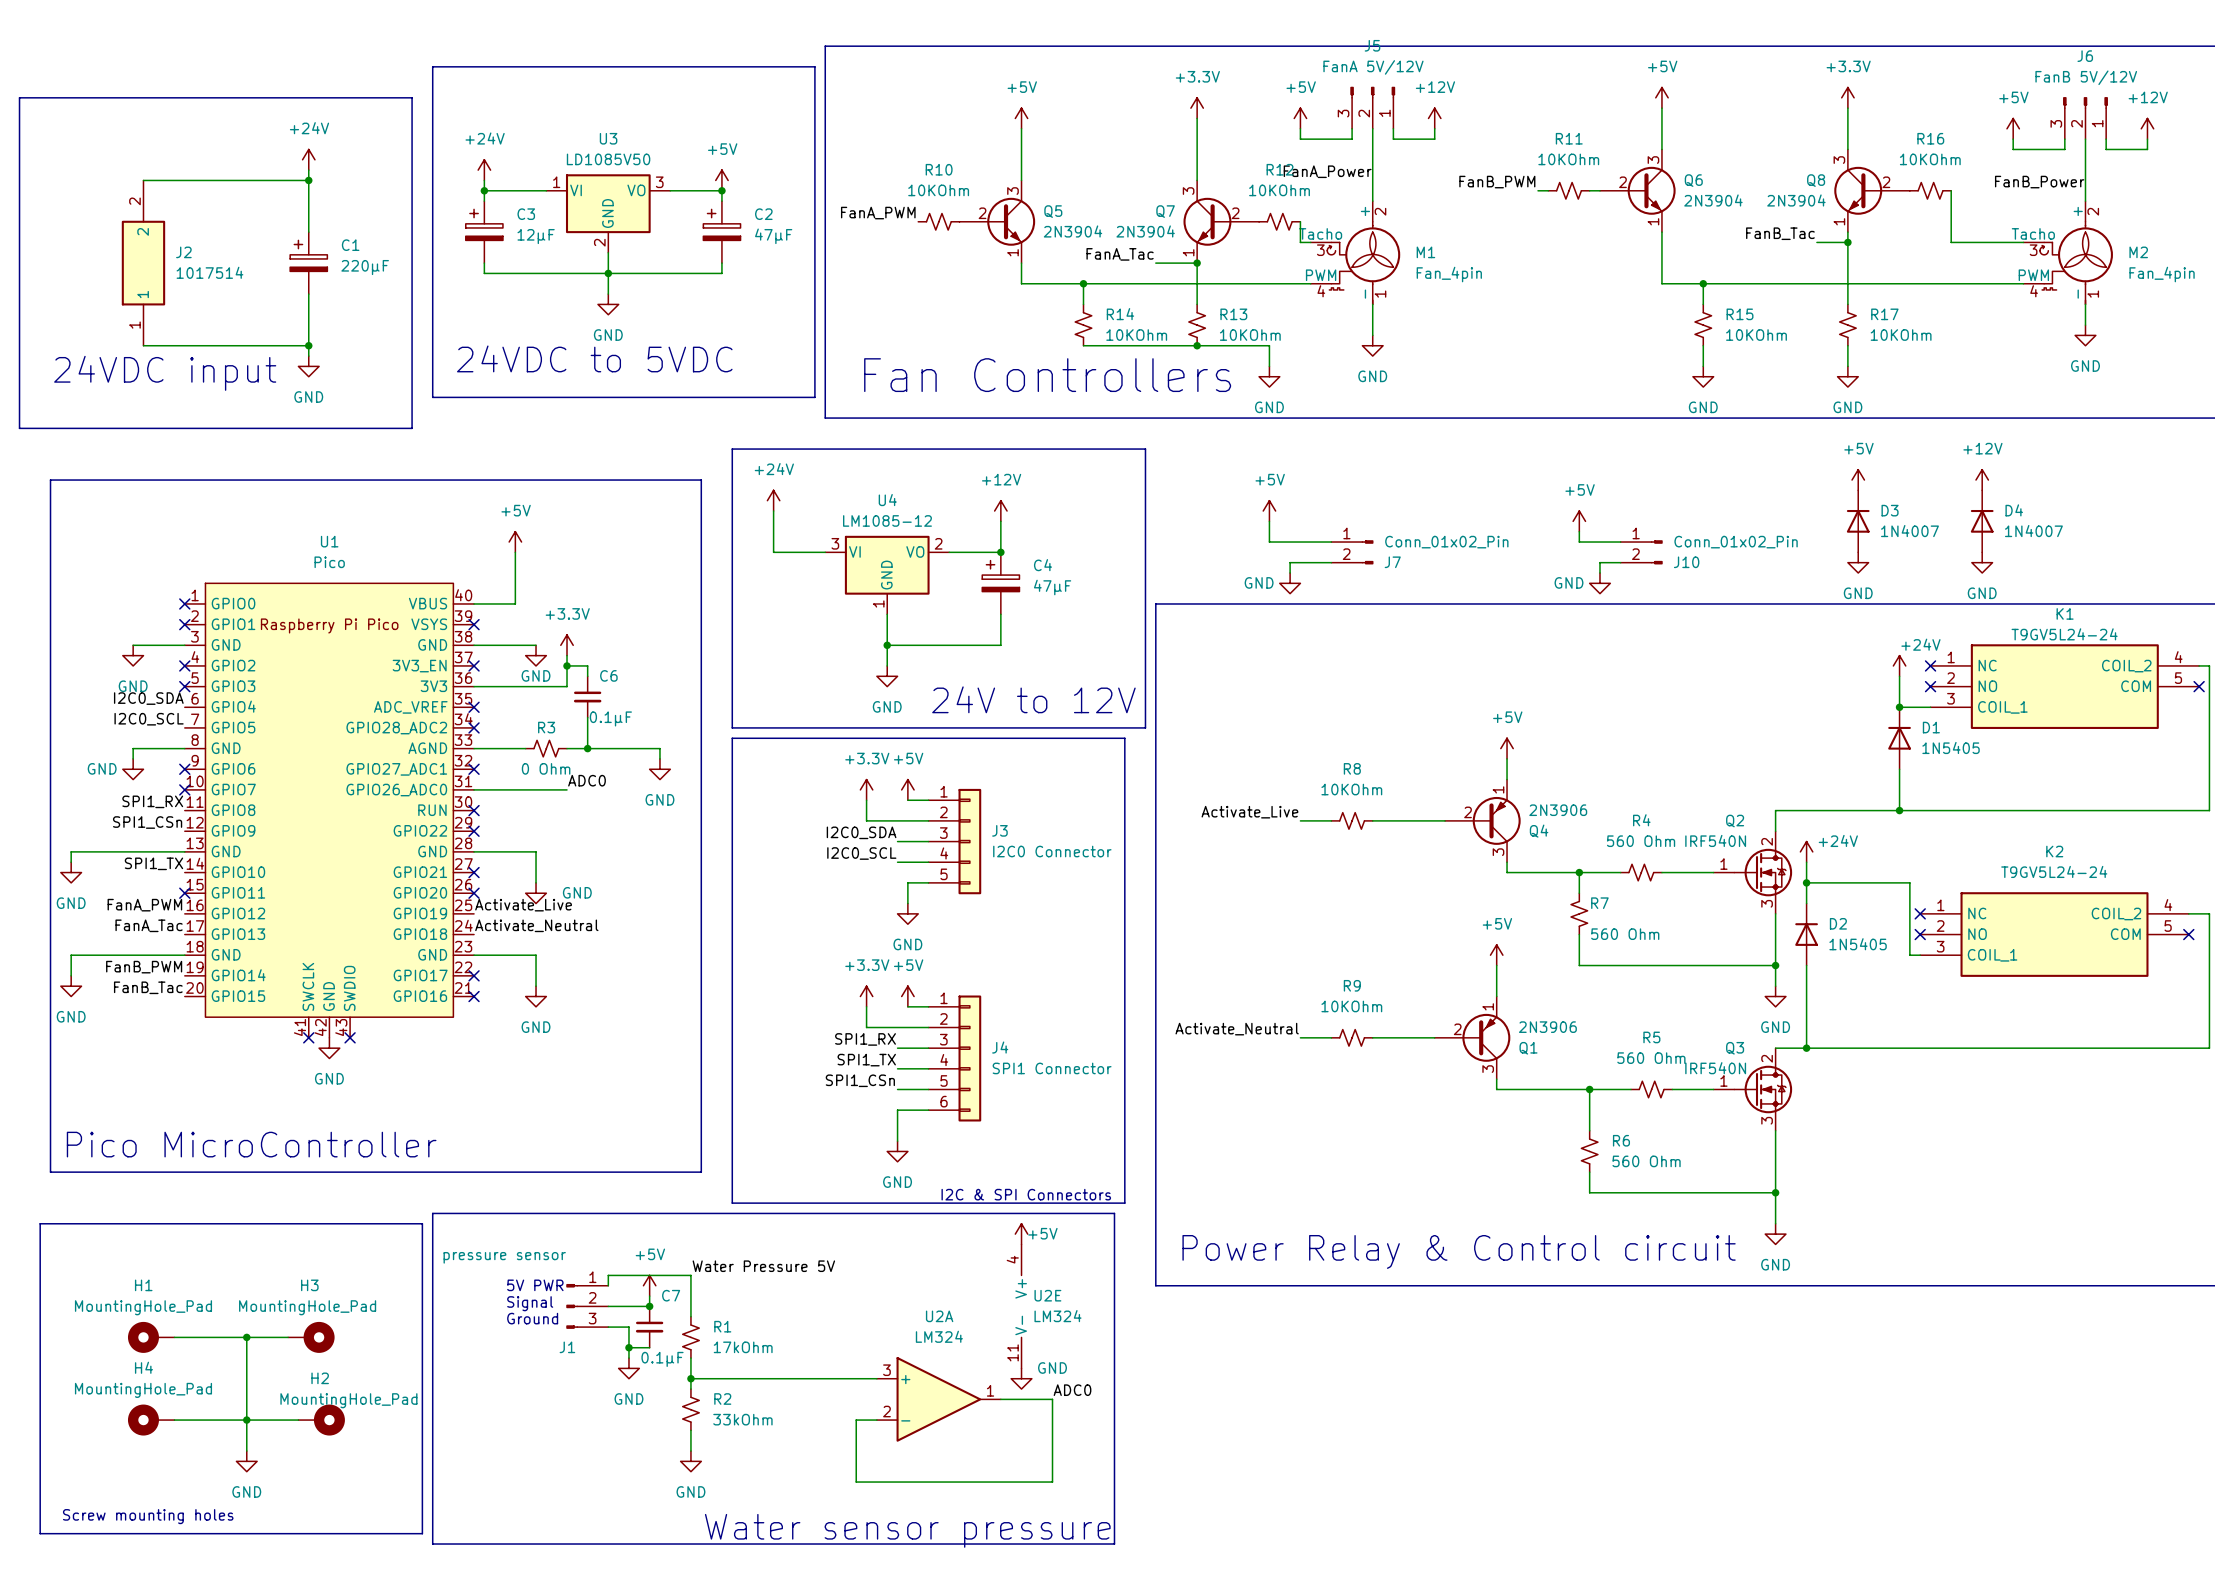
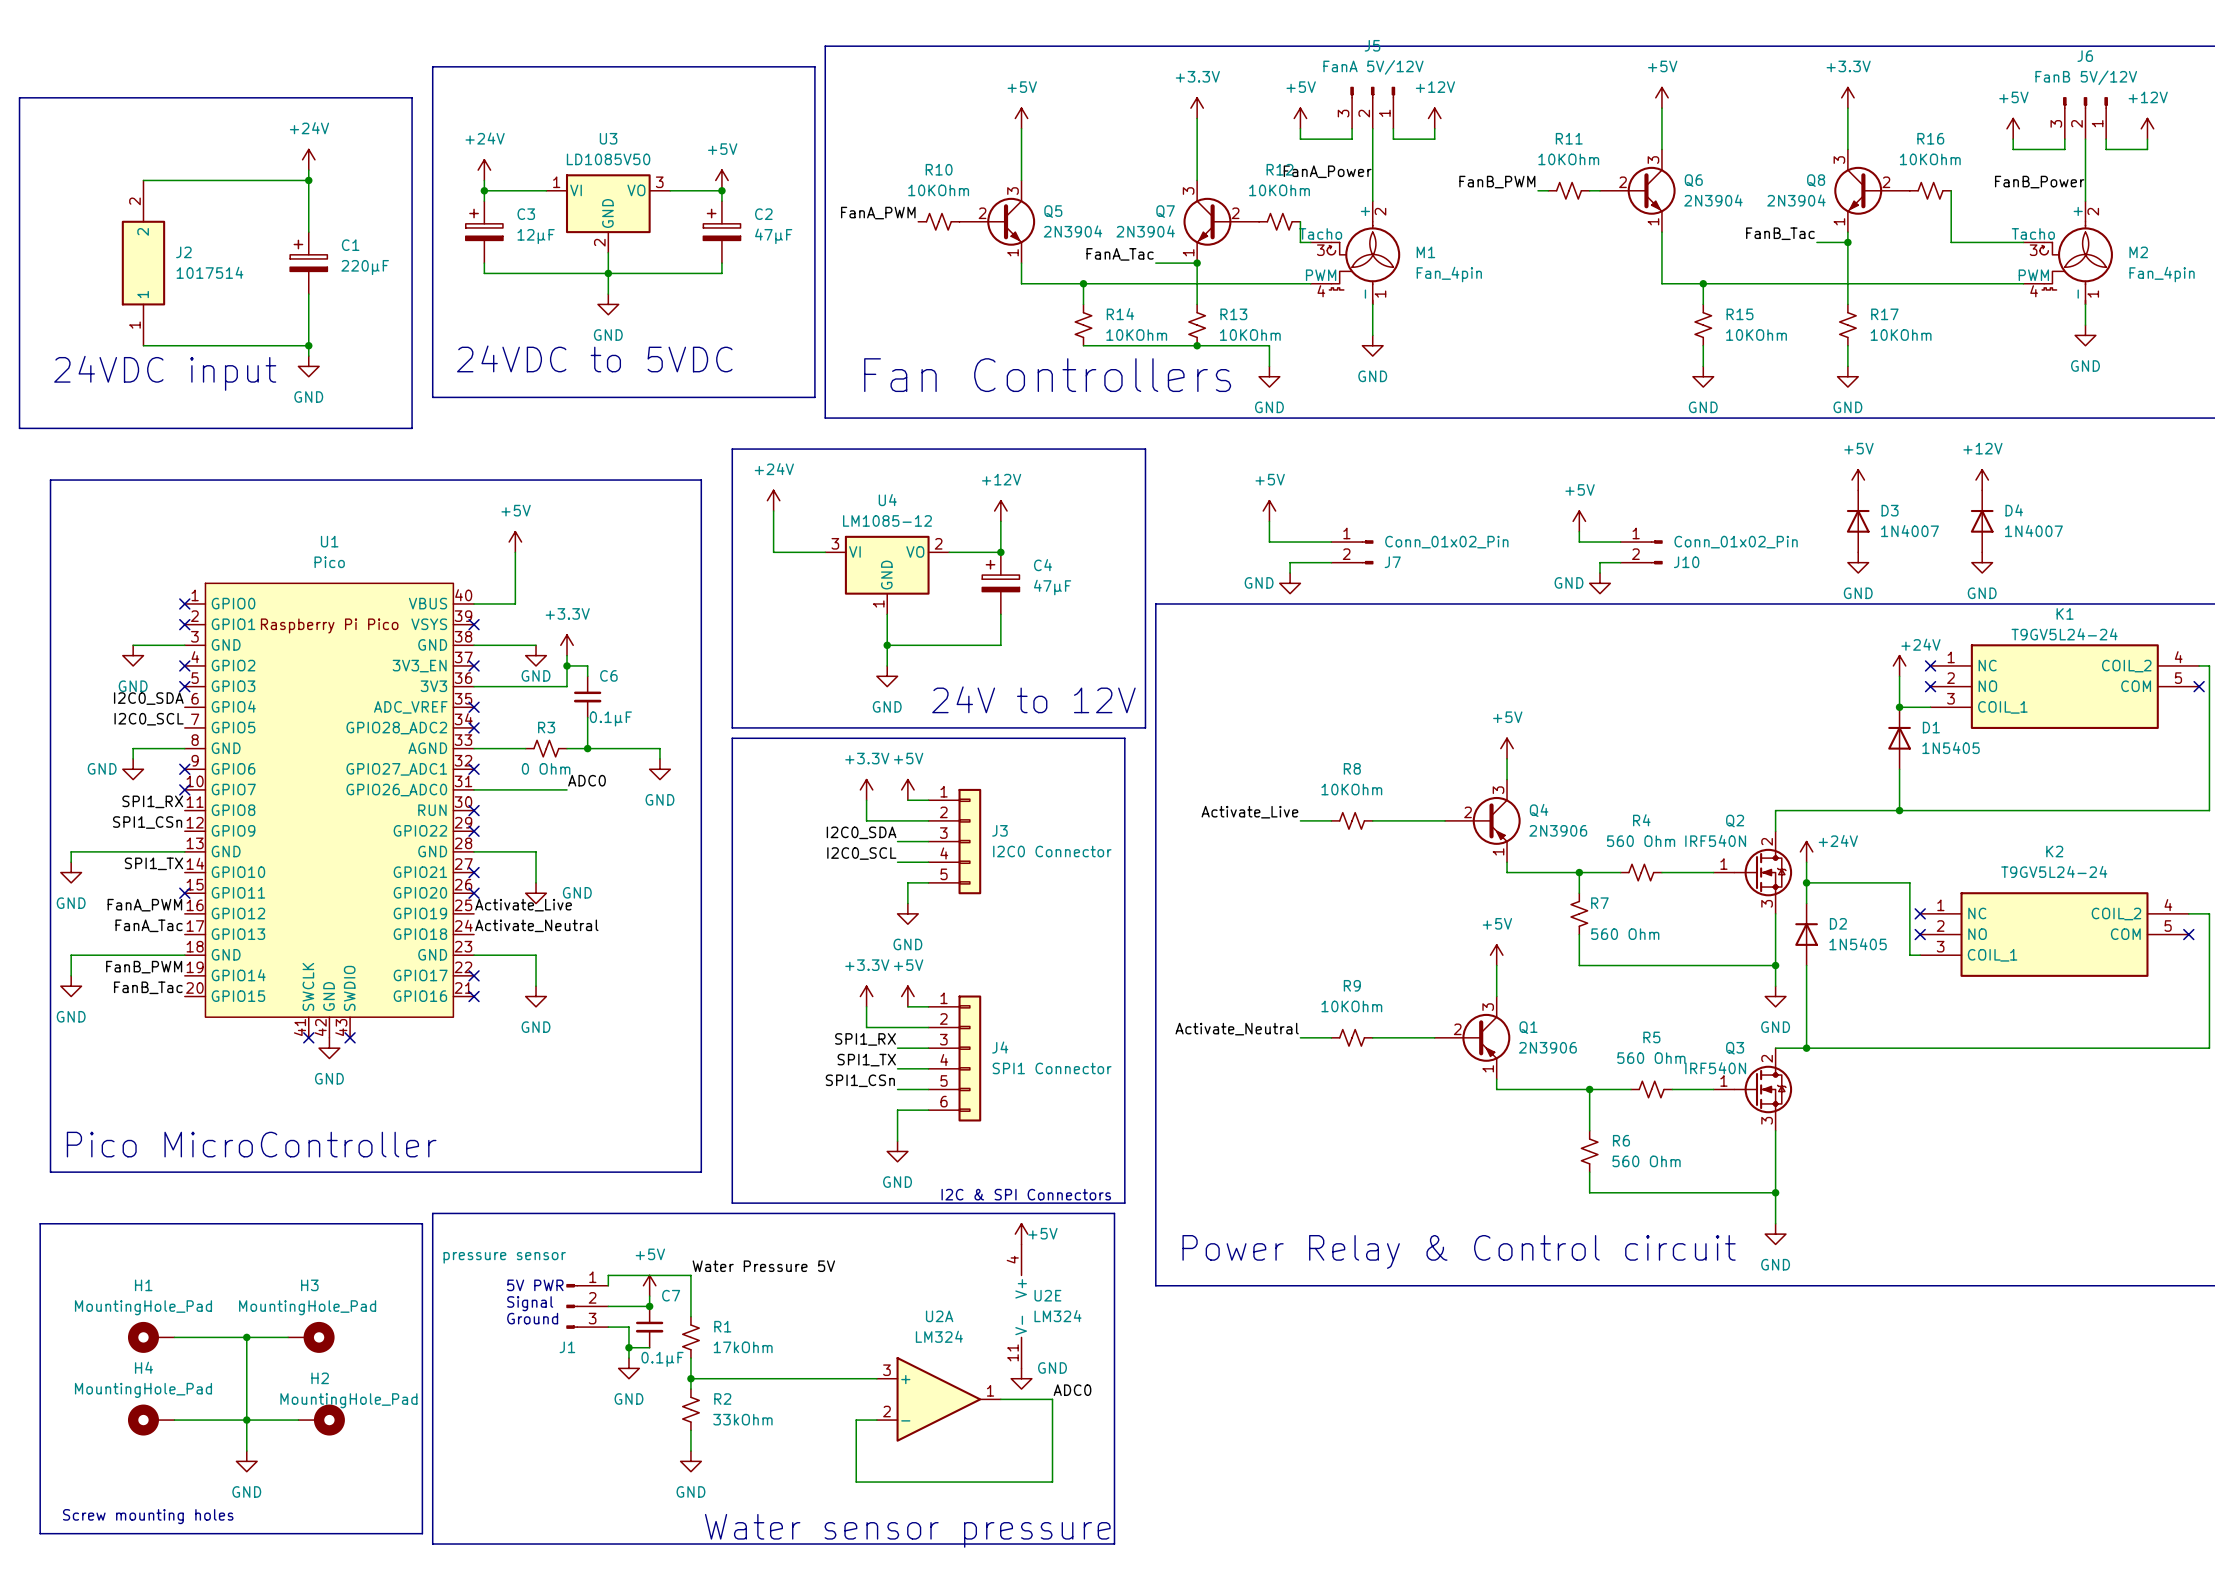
Q4 flip: as is (1496, 820) -> up-down (1496, 820)
Q1 flip: as is (1486, 1037) -> up-down (1486, 1037)

